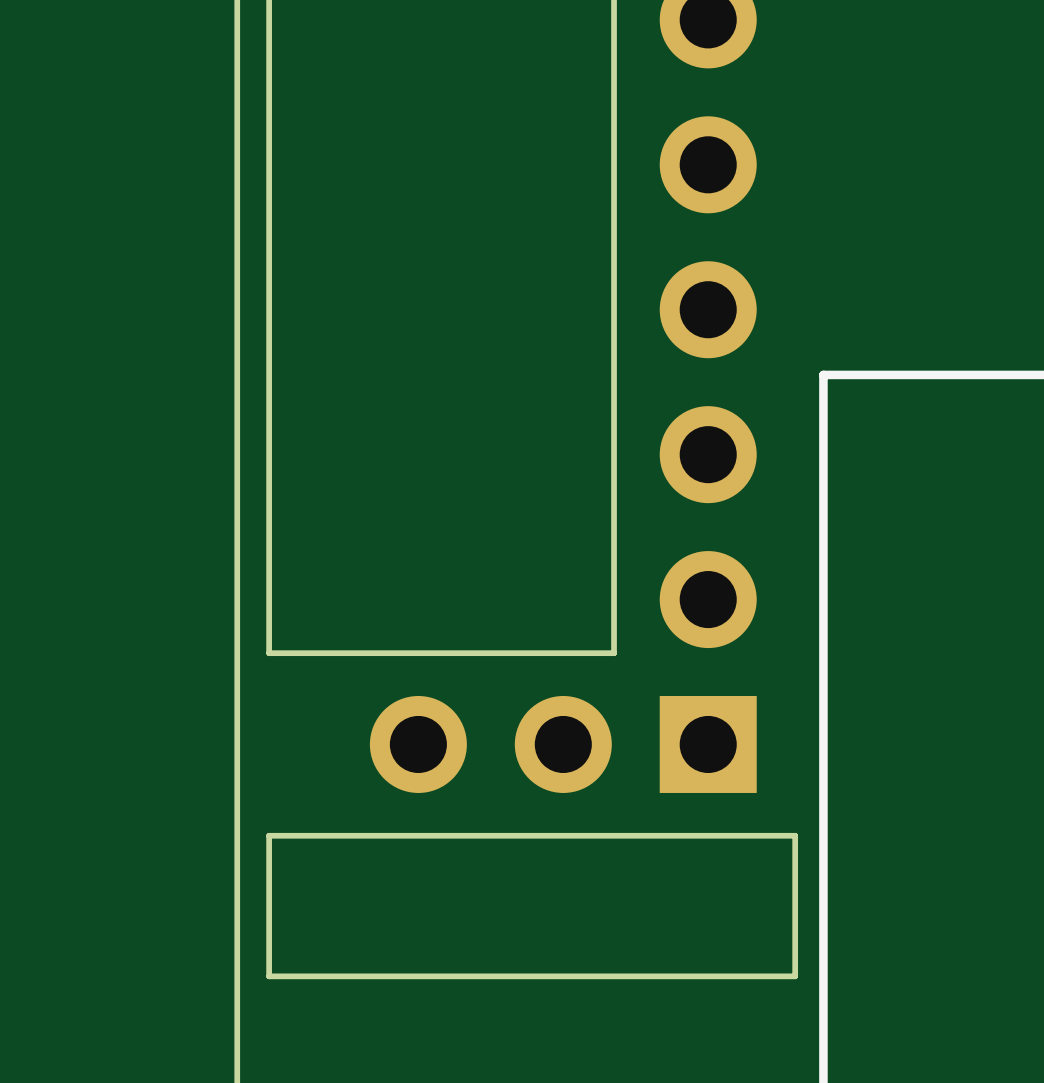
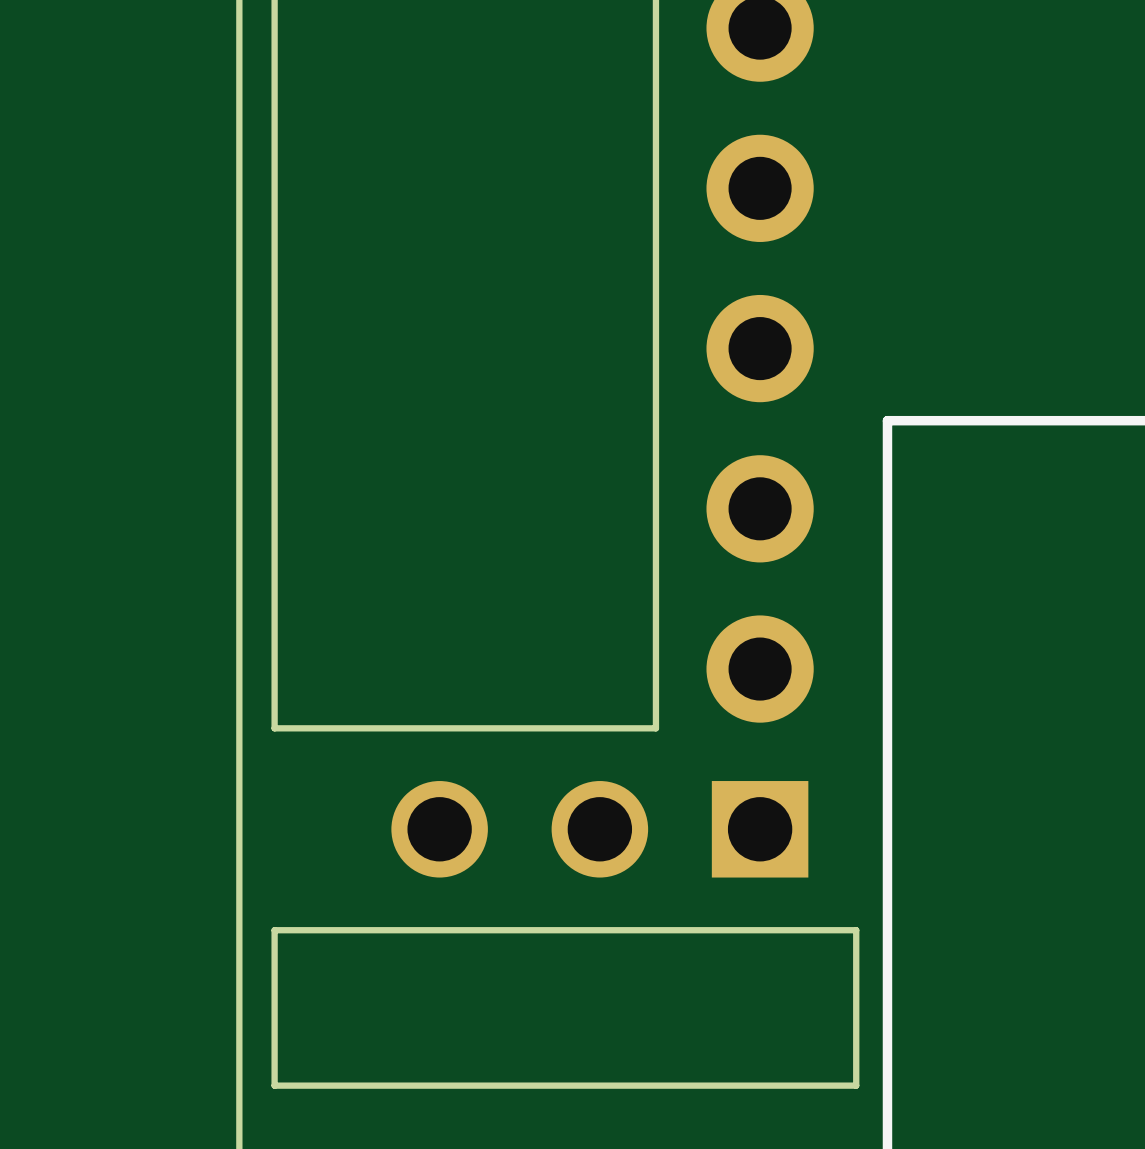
part footprint: [369, 695, 757, 793] -> [391, 781, 809, 878]

